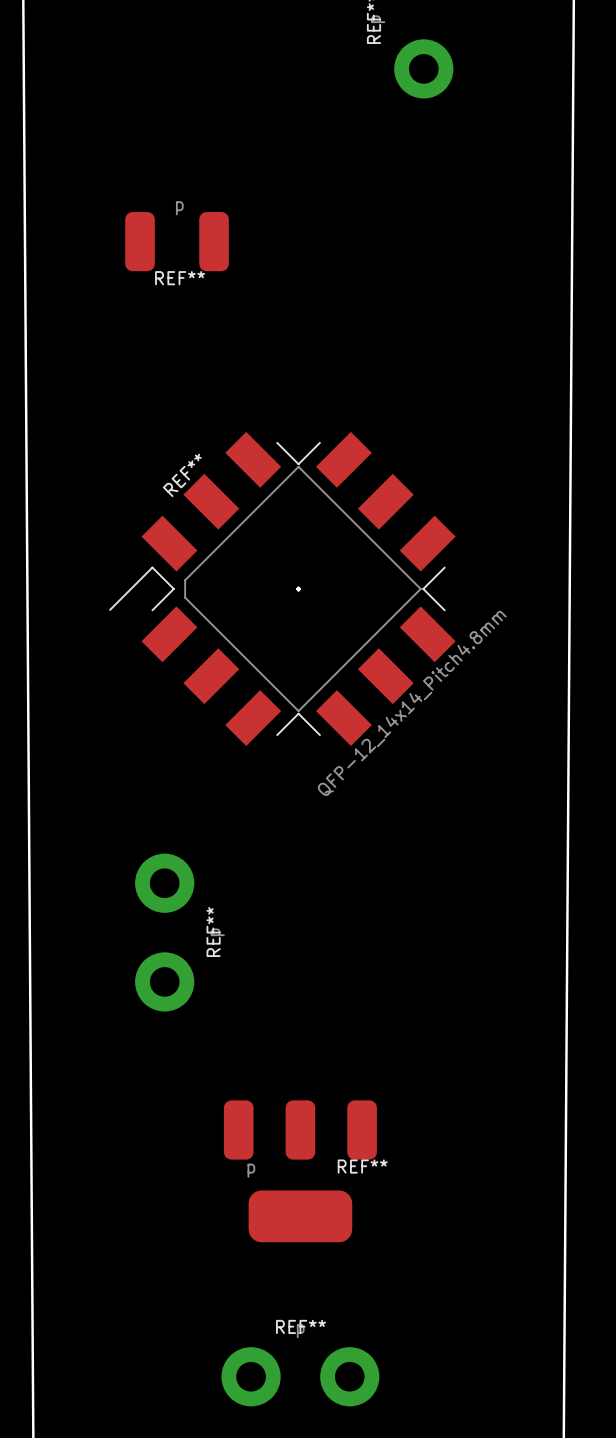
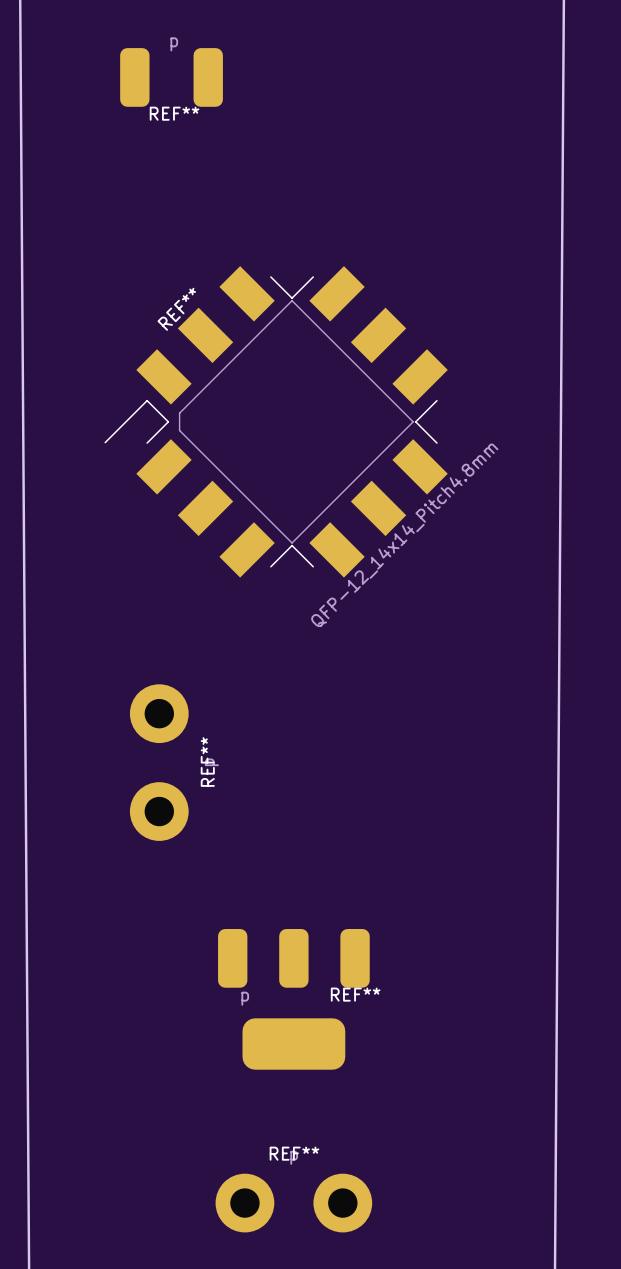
board edge: (298, 587) (299, 589) (298, 590) (297, 589) (298, 587) -> none

